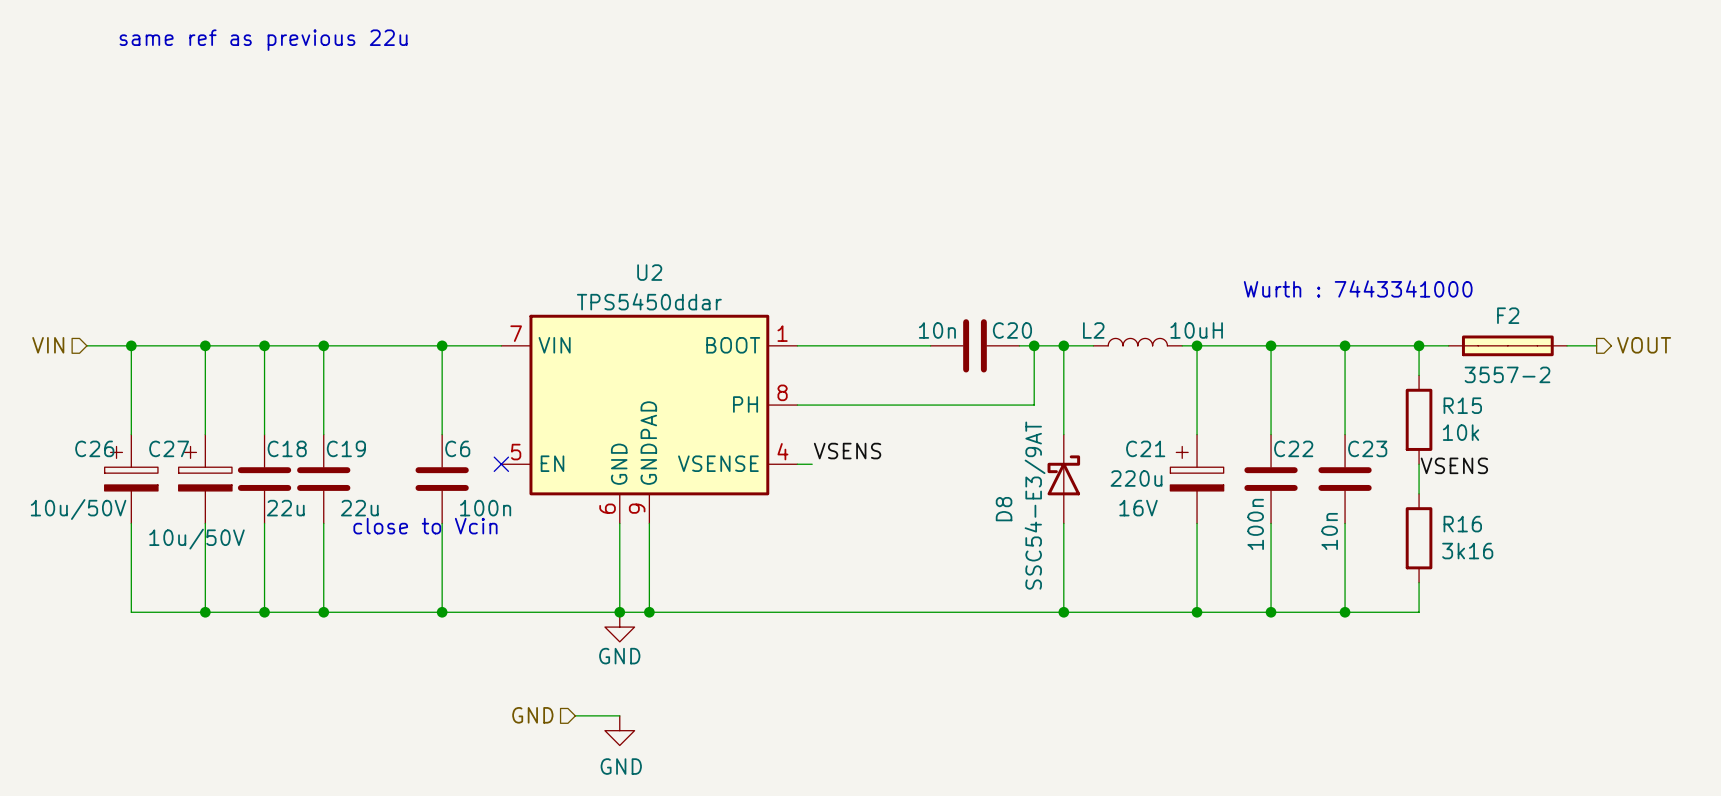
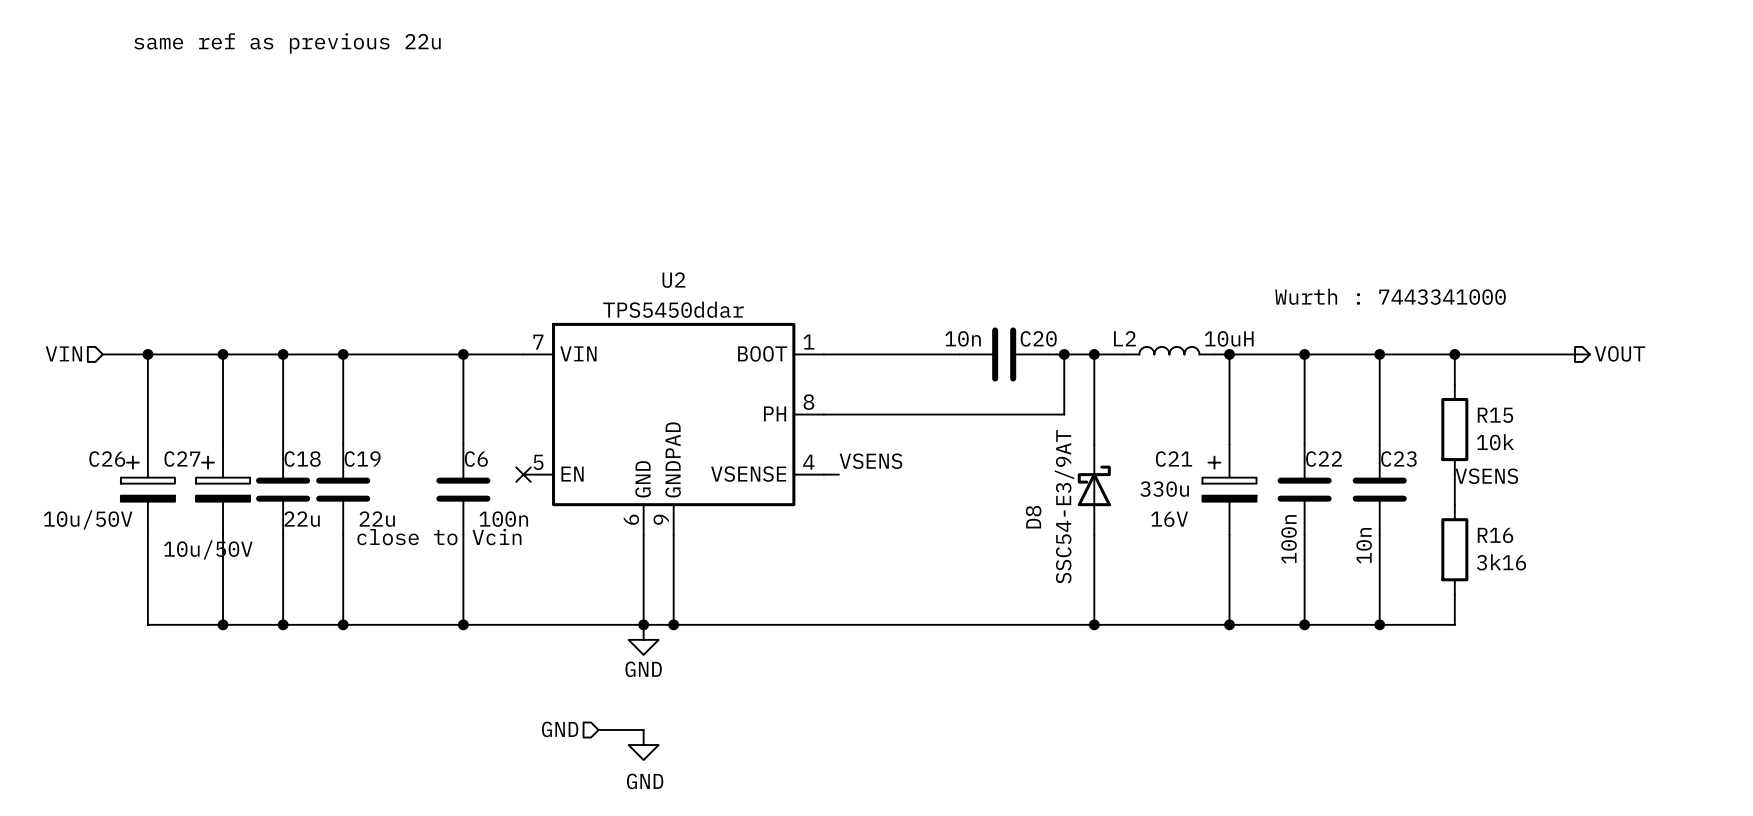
F2: 3557-2 (1507, 345) -> none
wire: (1567, 345) (1596, 345) -> none
hierarchical label position: VOUT (1644, 345) -> VOUT (1620, 353)
C21 value: 220u (1136, 478) -> 330u (1164, 489)

